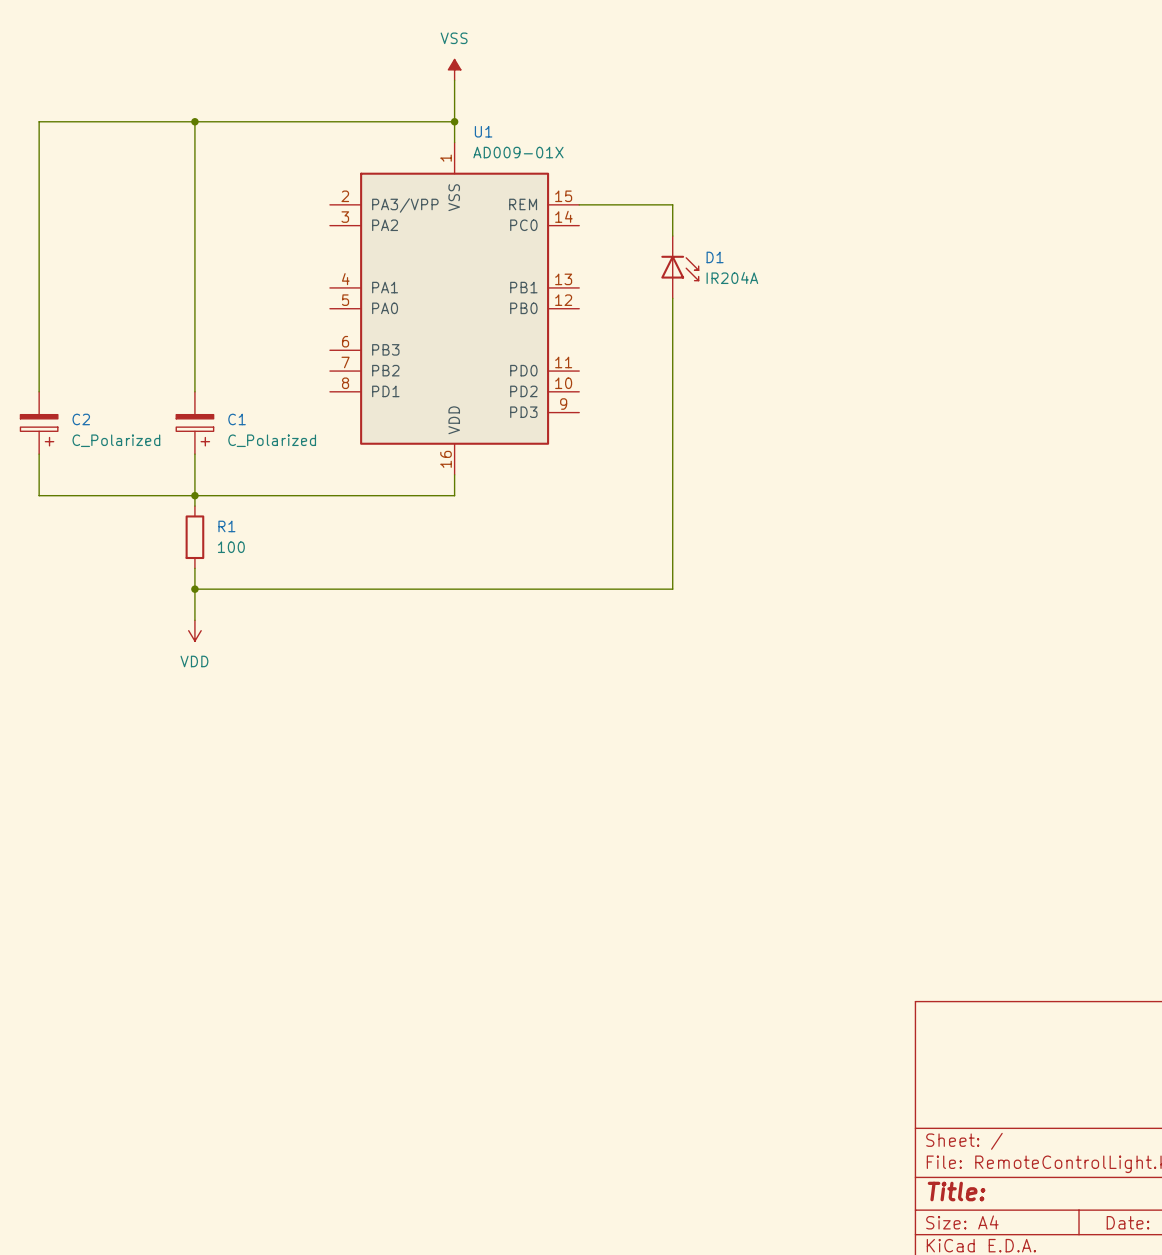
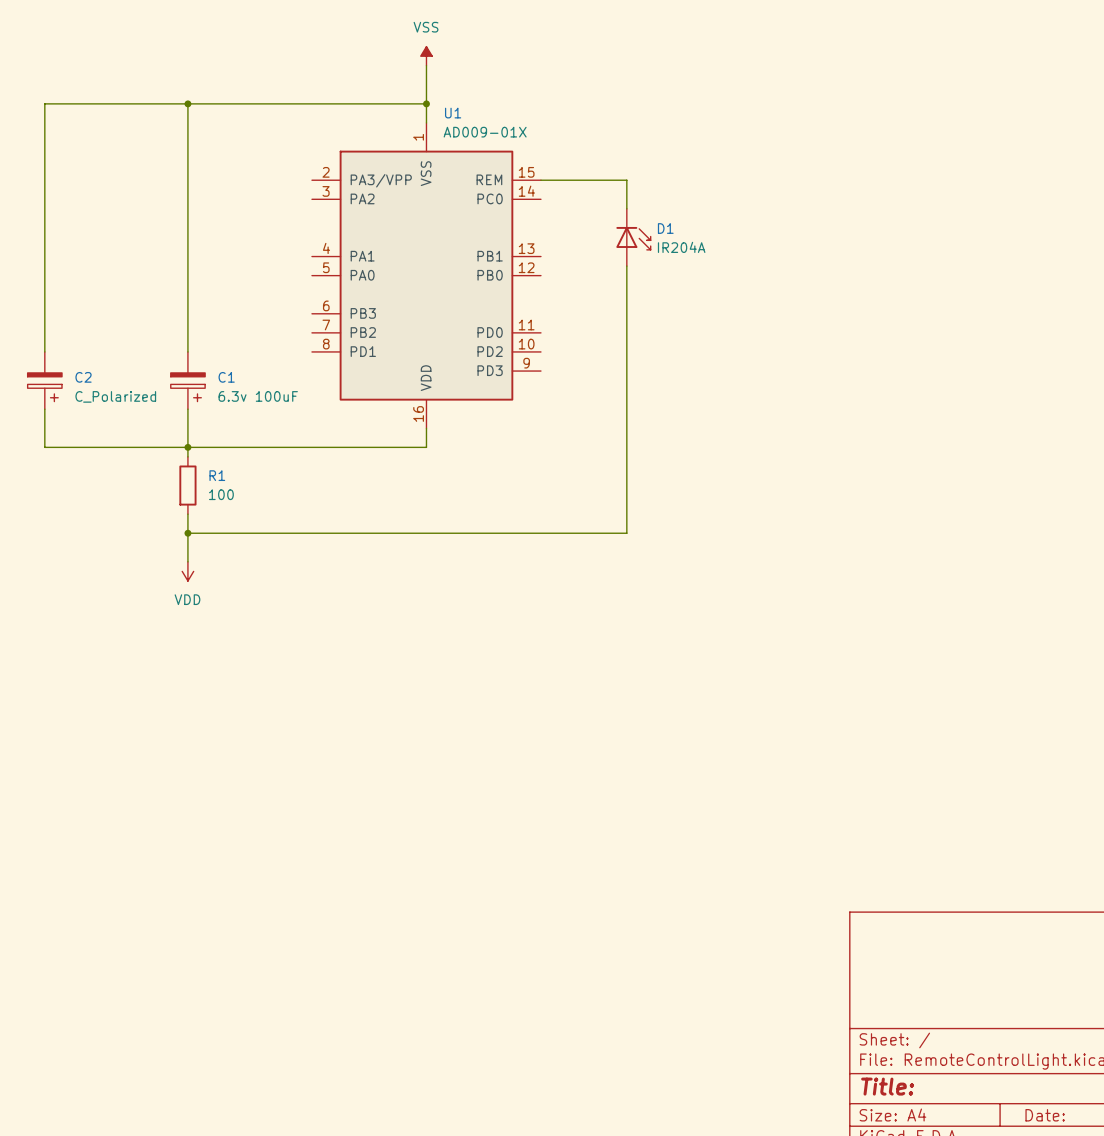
C1 value: C_Polarized (272, 440) -> 6.3v 100uF (258, 396)

